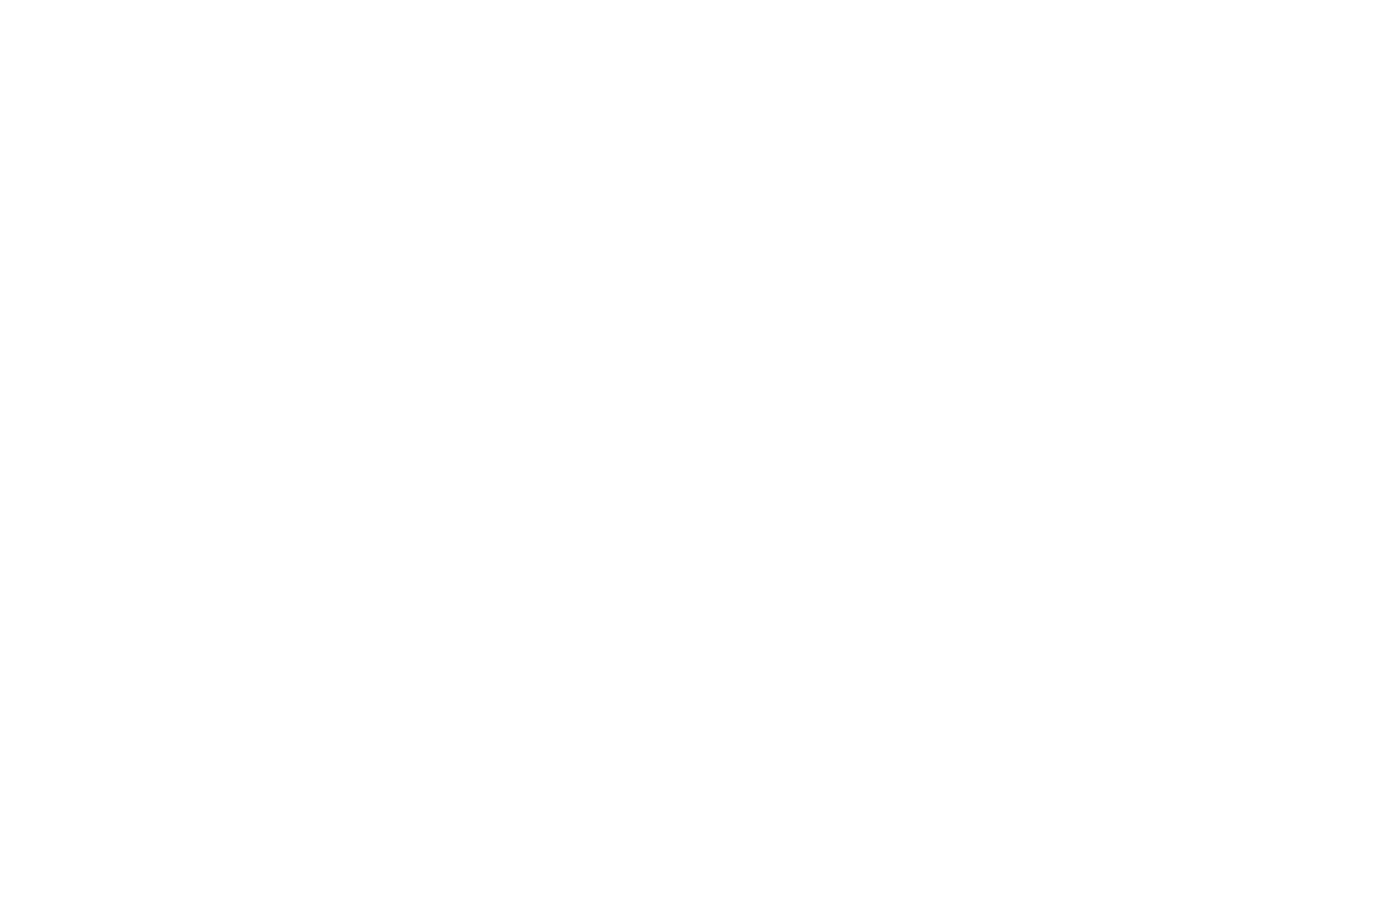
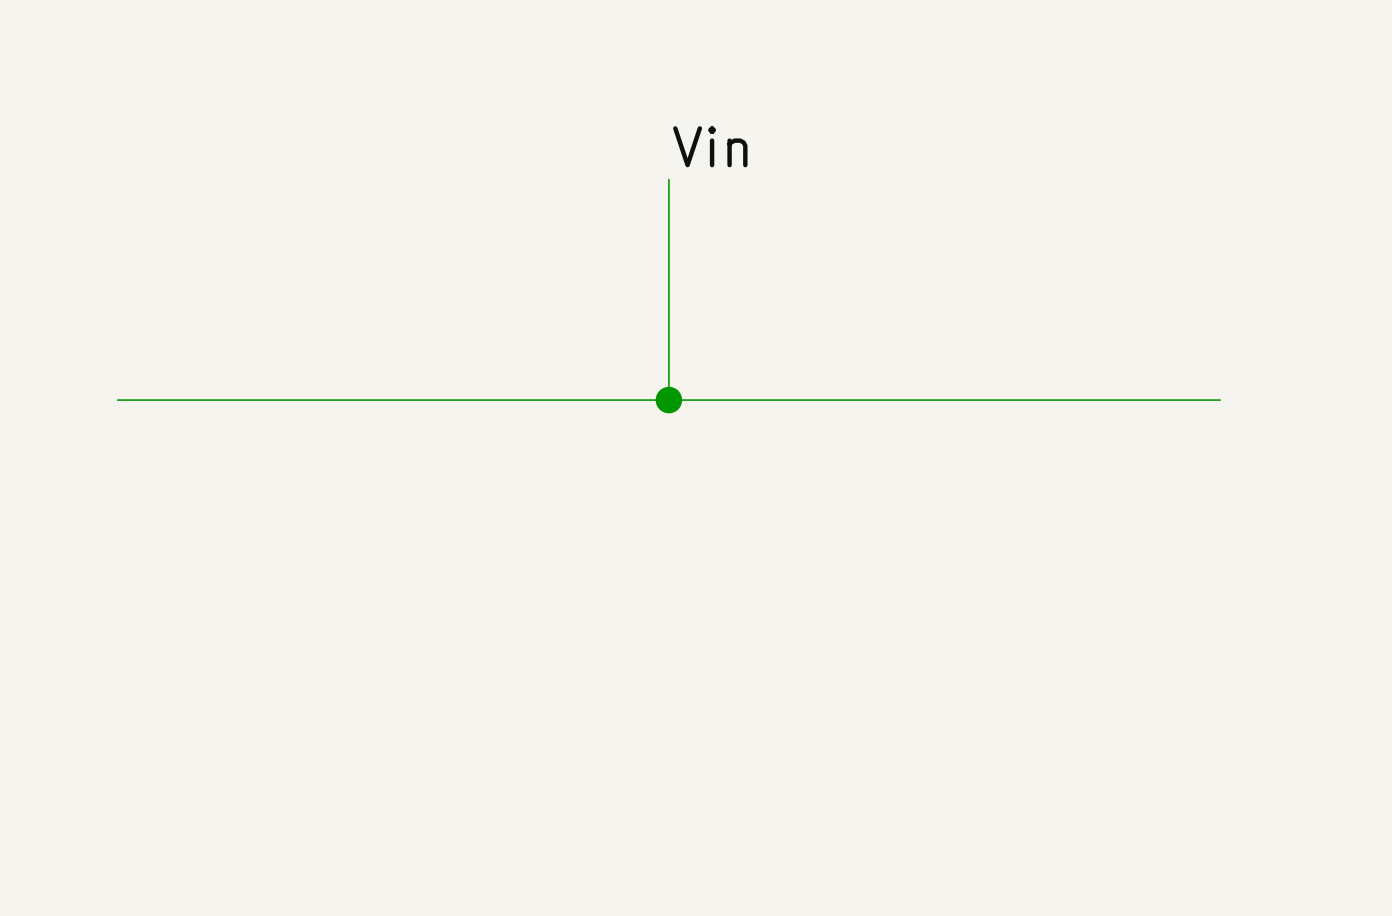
label: none -> Vin (710, 146)
wire: none -> (668, 179) (668, 400)
wire: none -> (117, 400) (1220, 400)
junction: none -> (668, 400)

